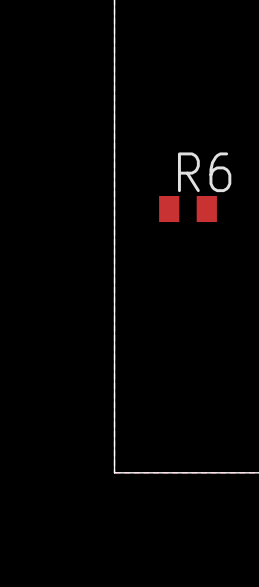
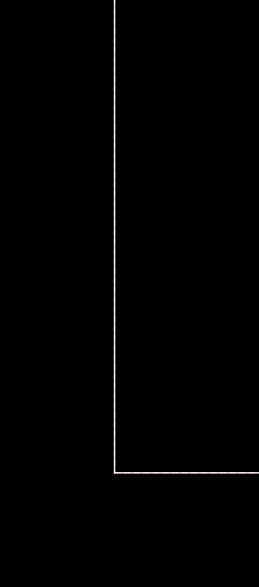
R6: (188, 209) -> none

